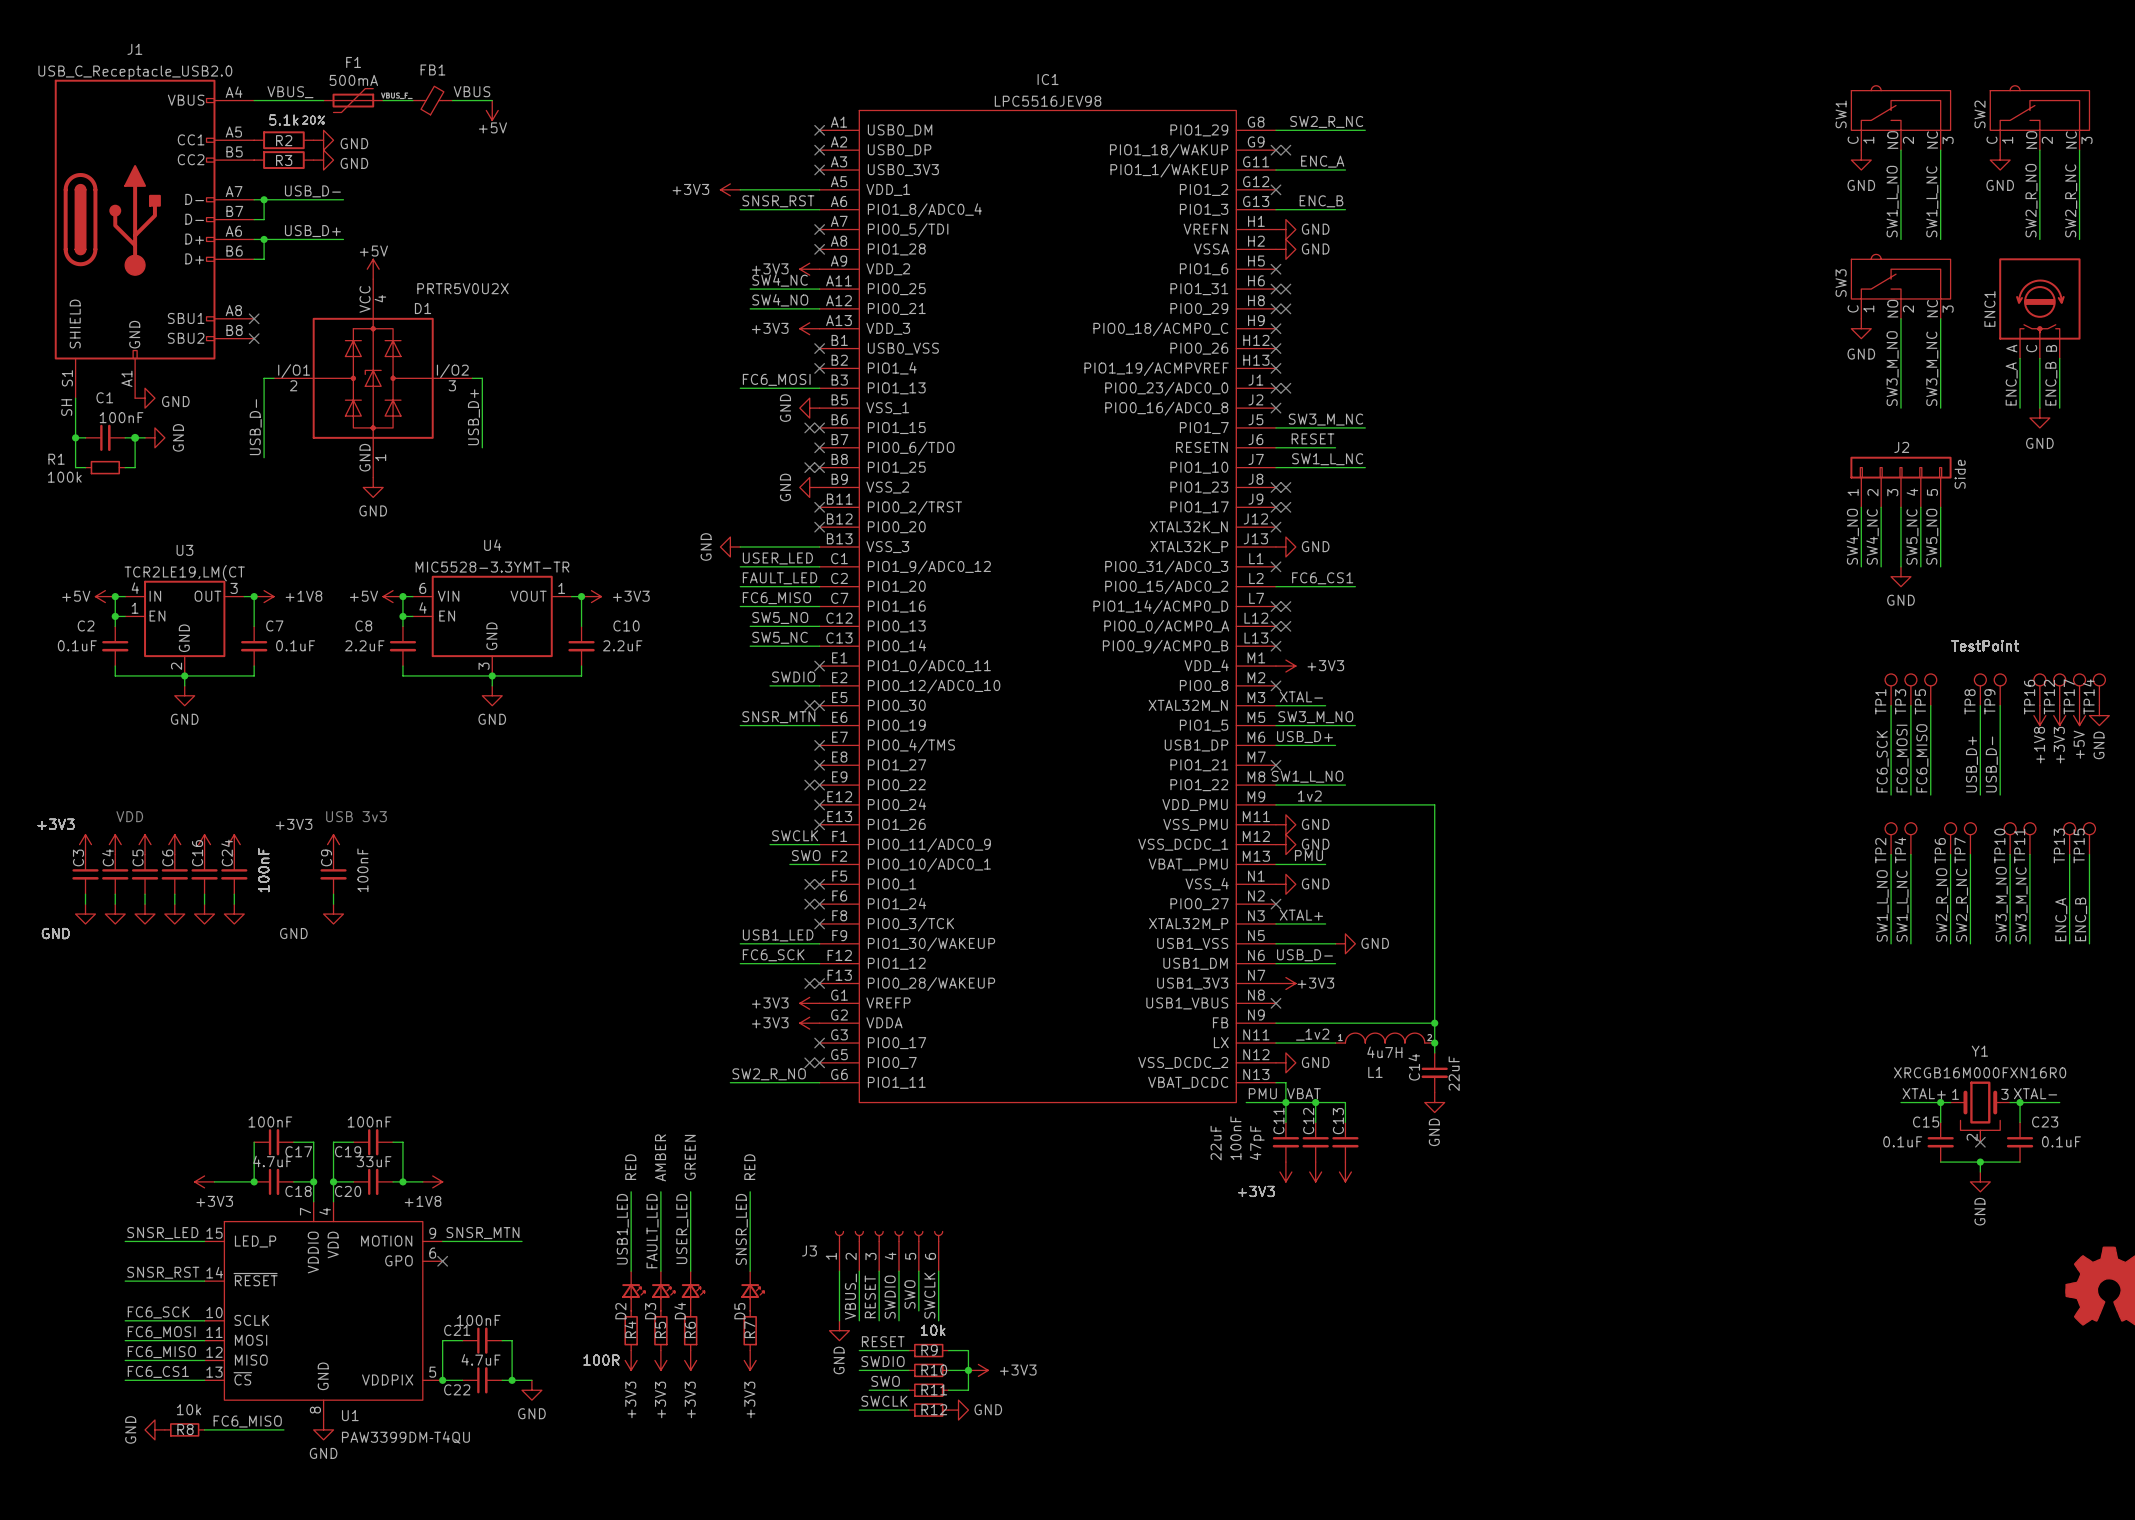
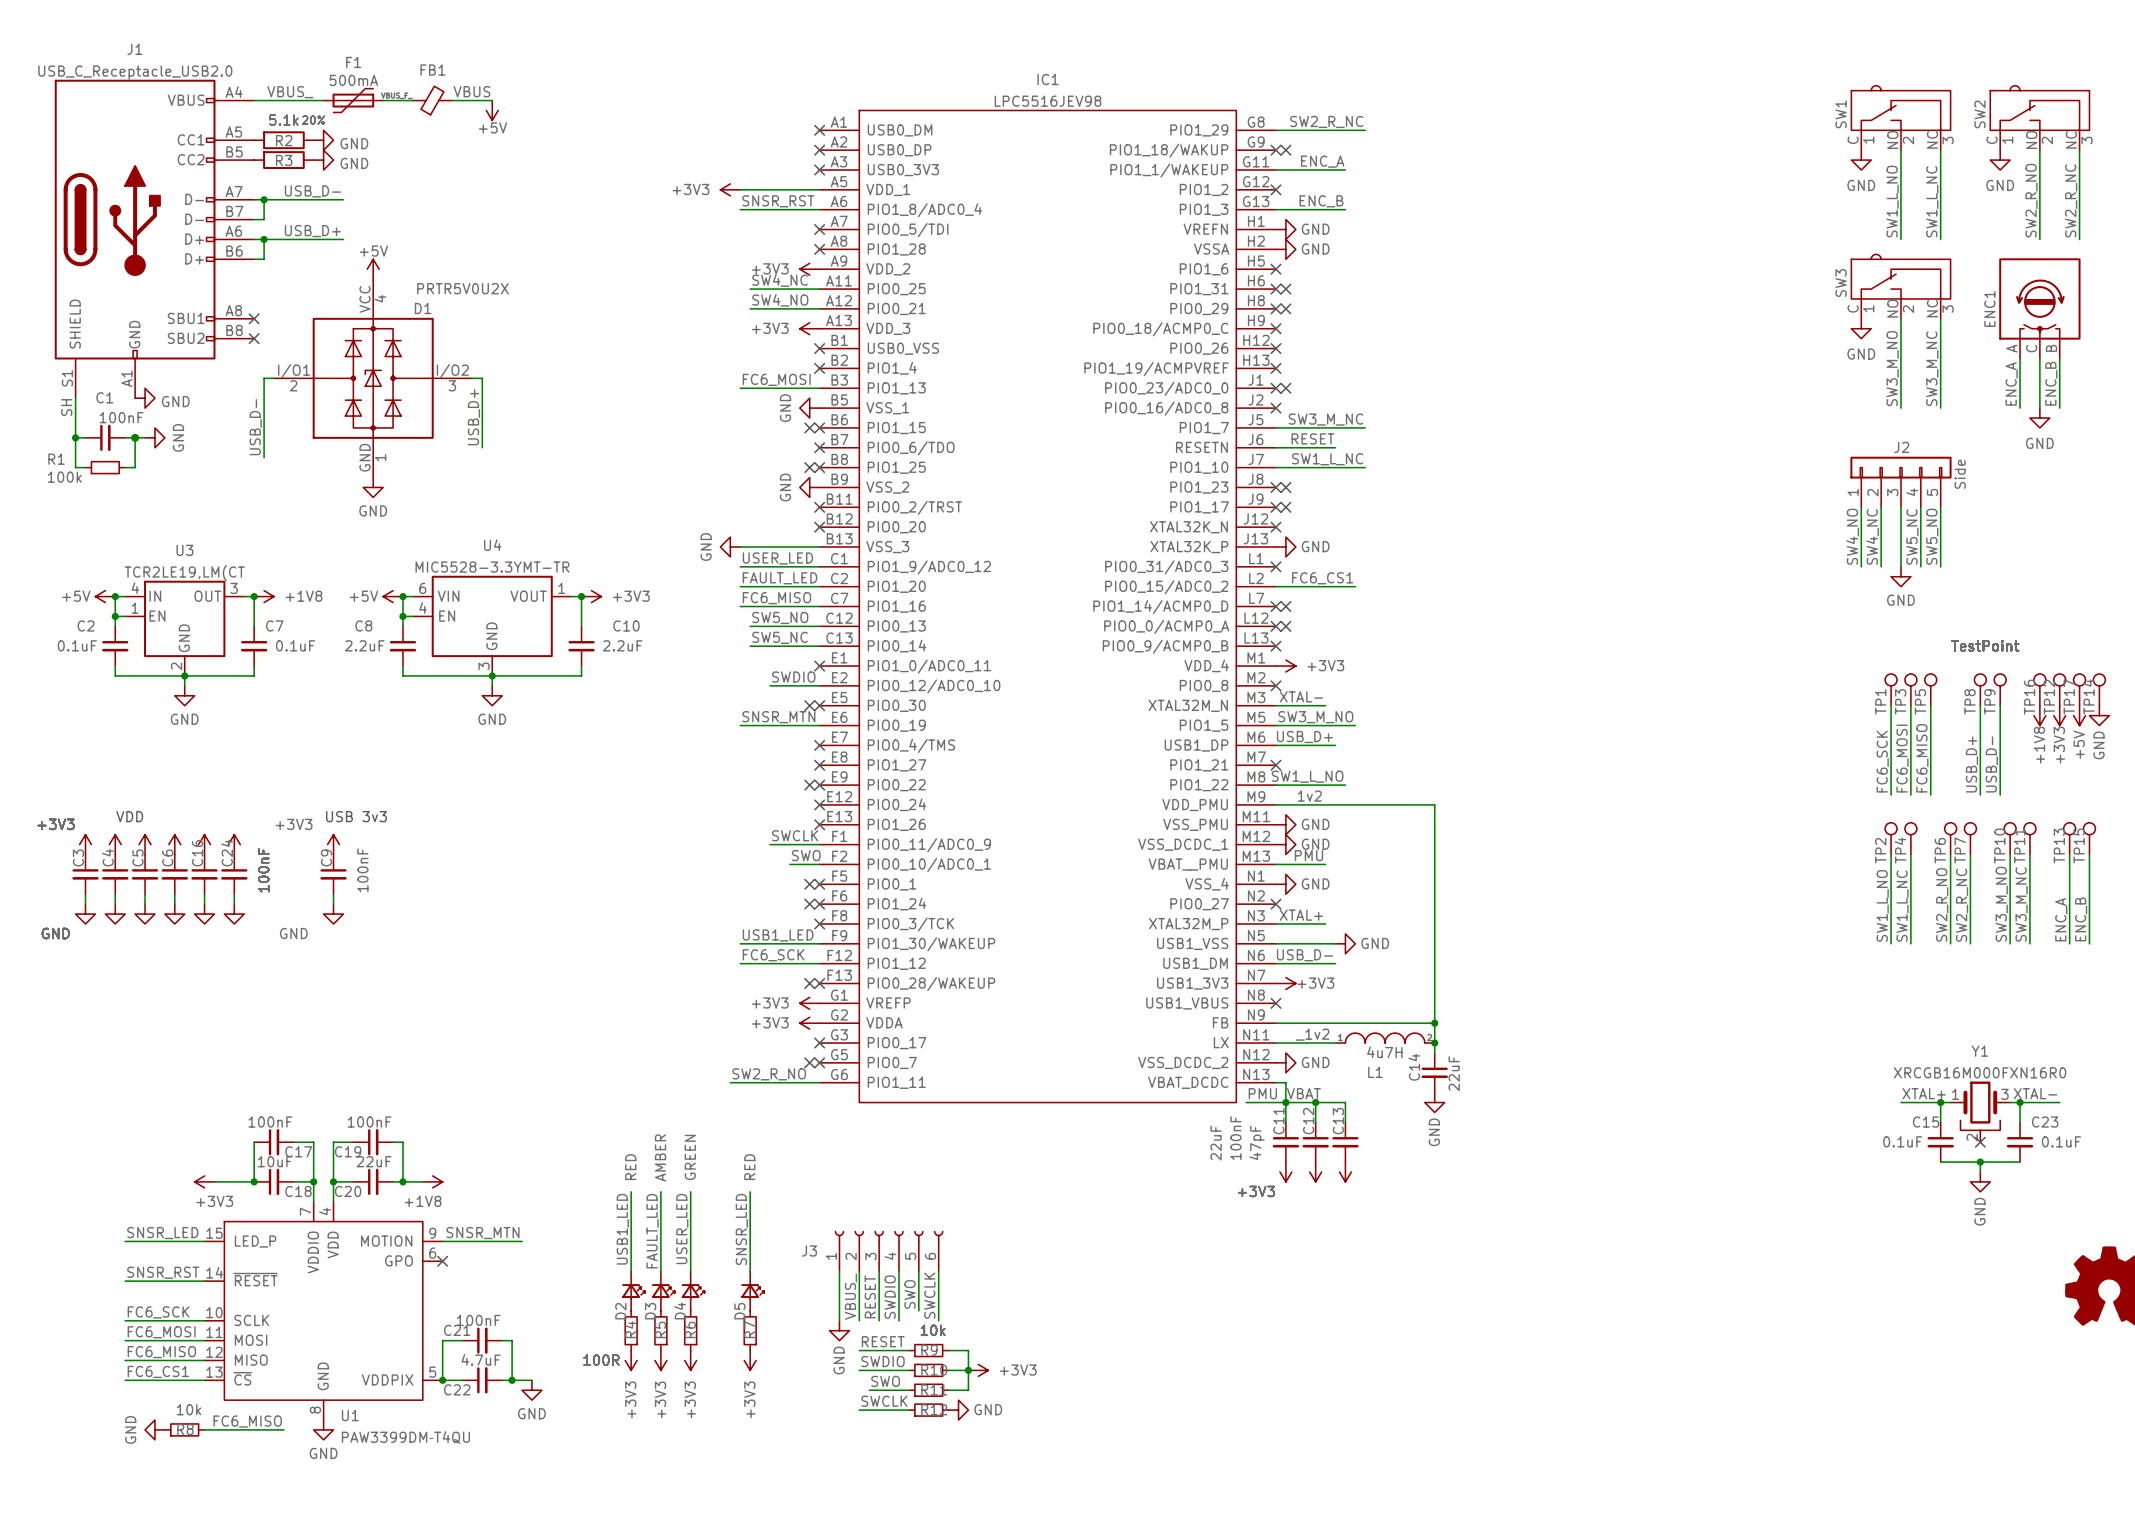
C18 value: 4.7uF (272, 1161) -> 10uF (275, 1161)
C20 value: 33uF (374, 1161) -> 22uF (374, 1161)

